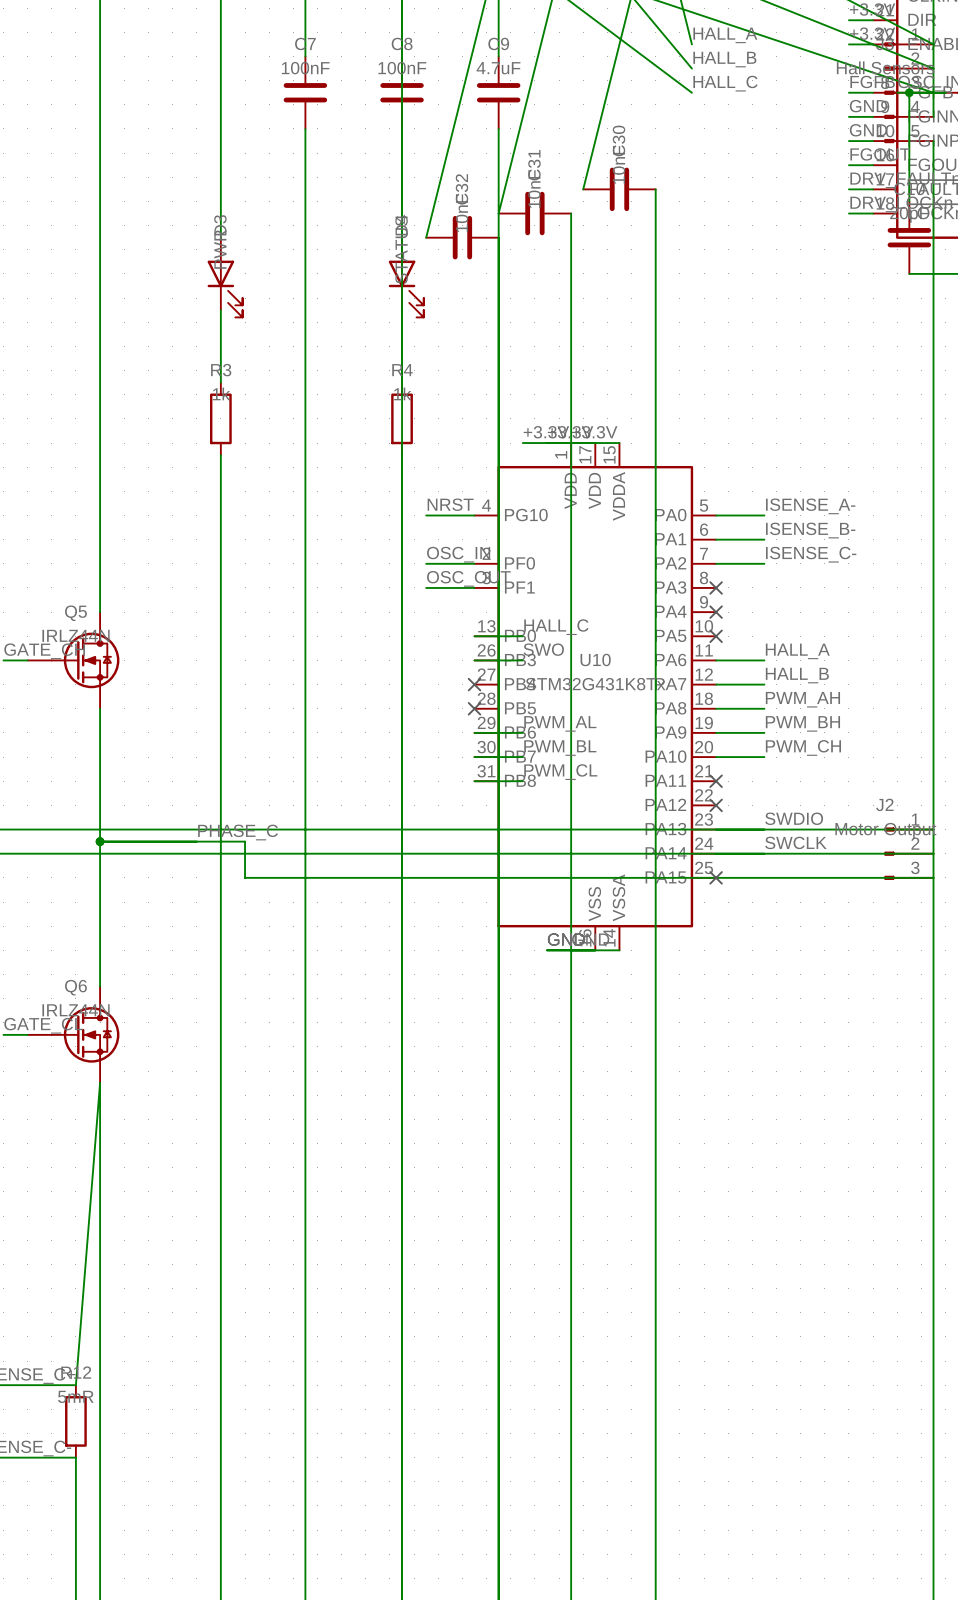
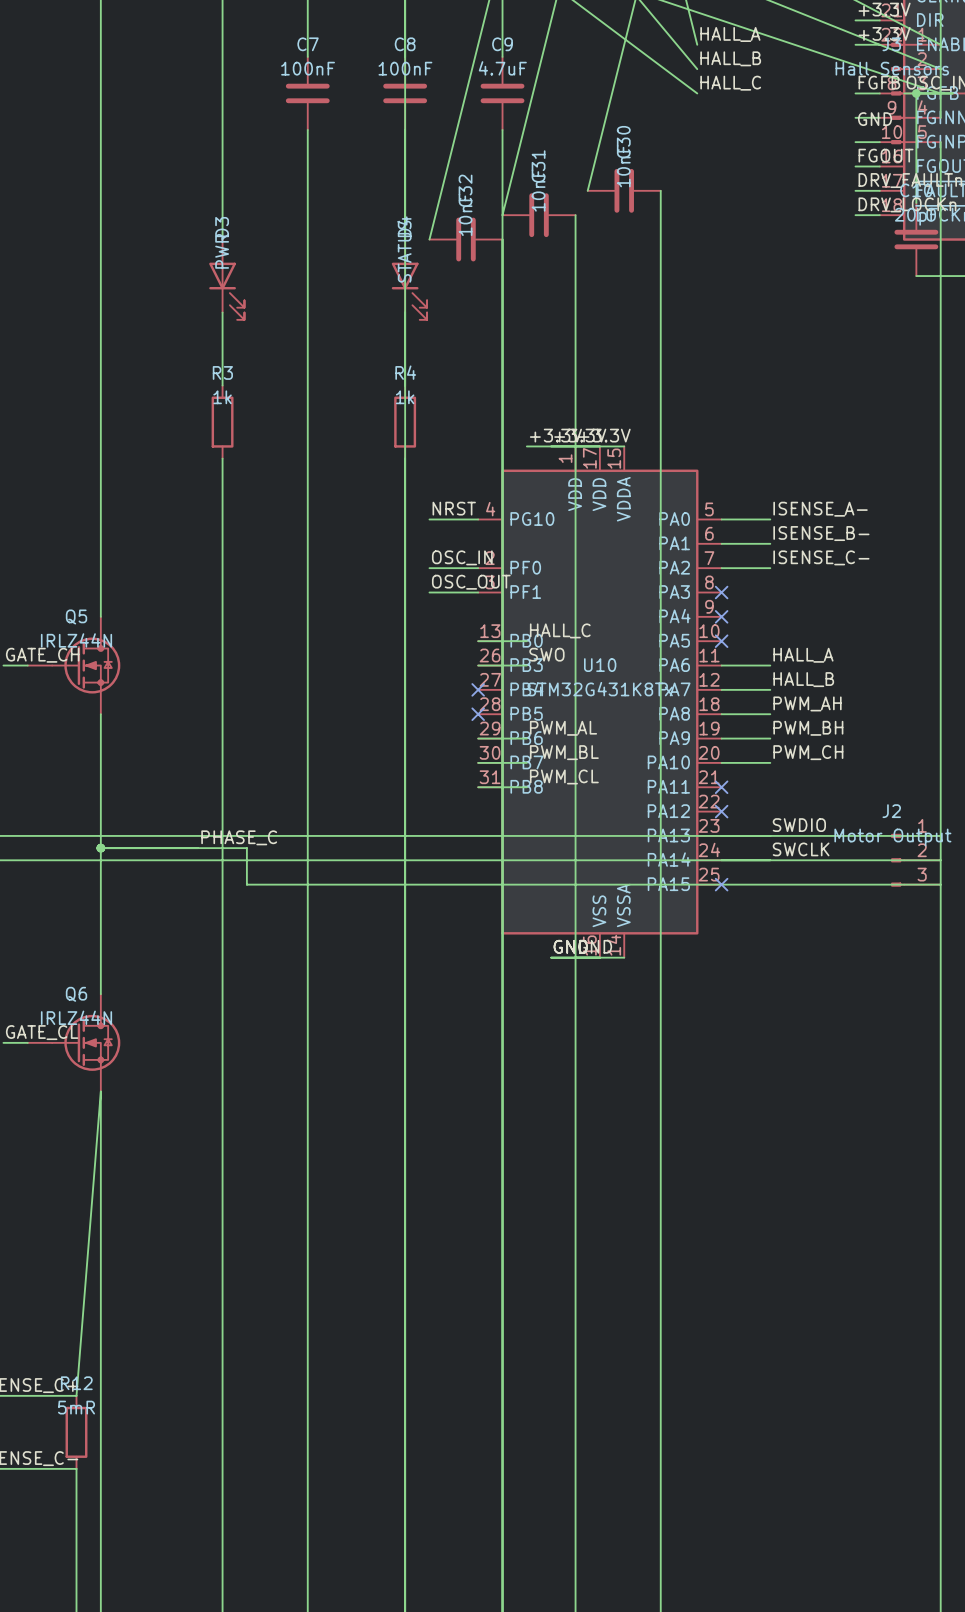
label: GND (868, 106) -> none
label: none -> GND (875, 119)
label: GND (868, 130) -> none

